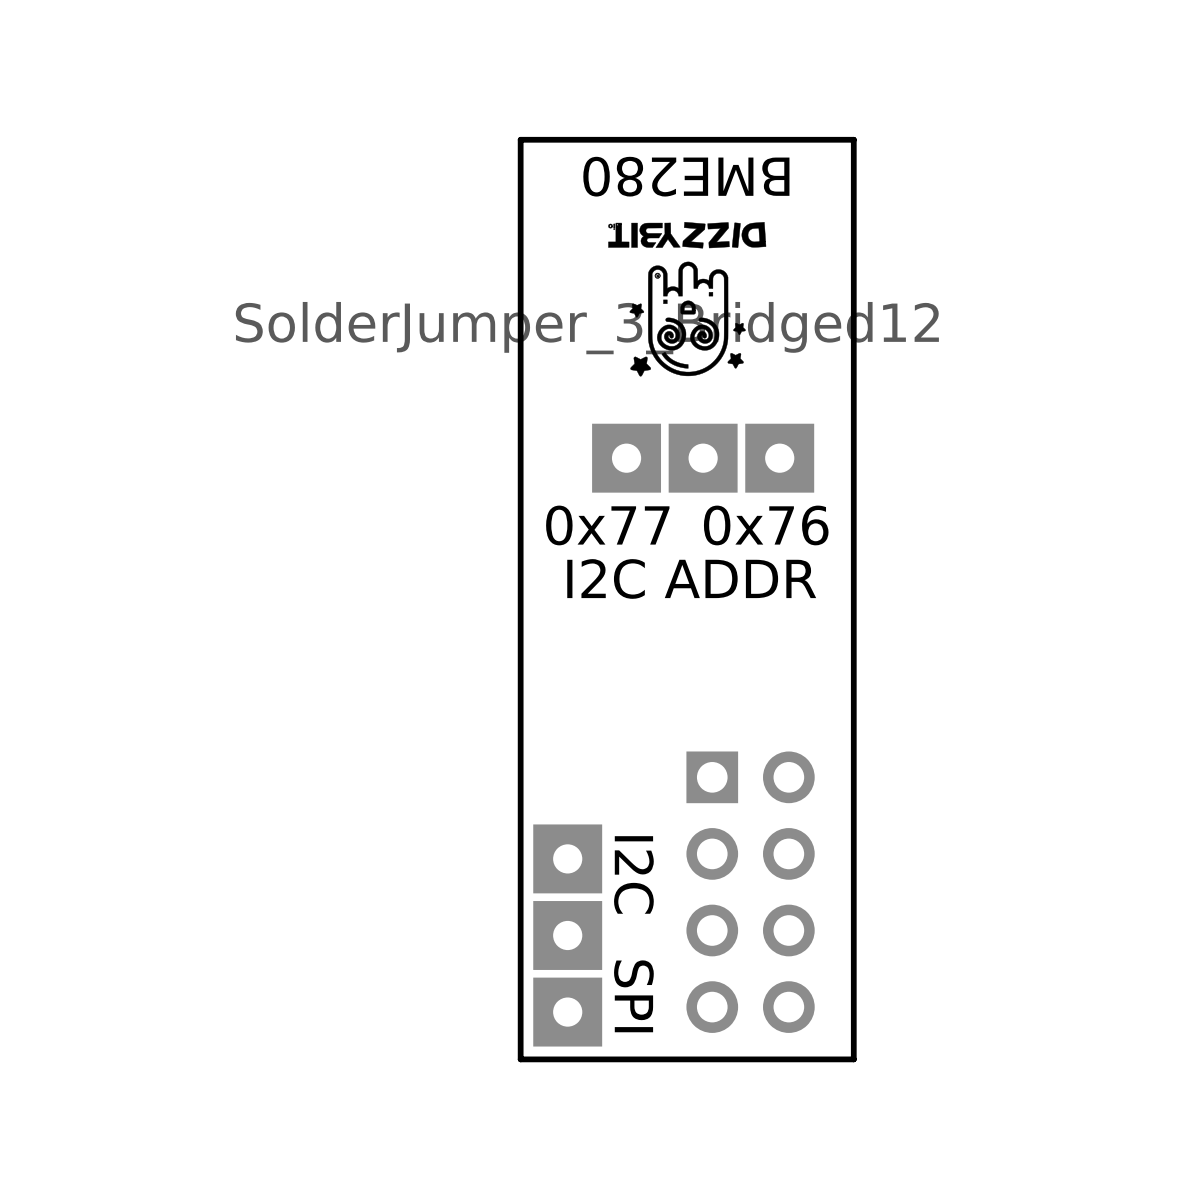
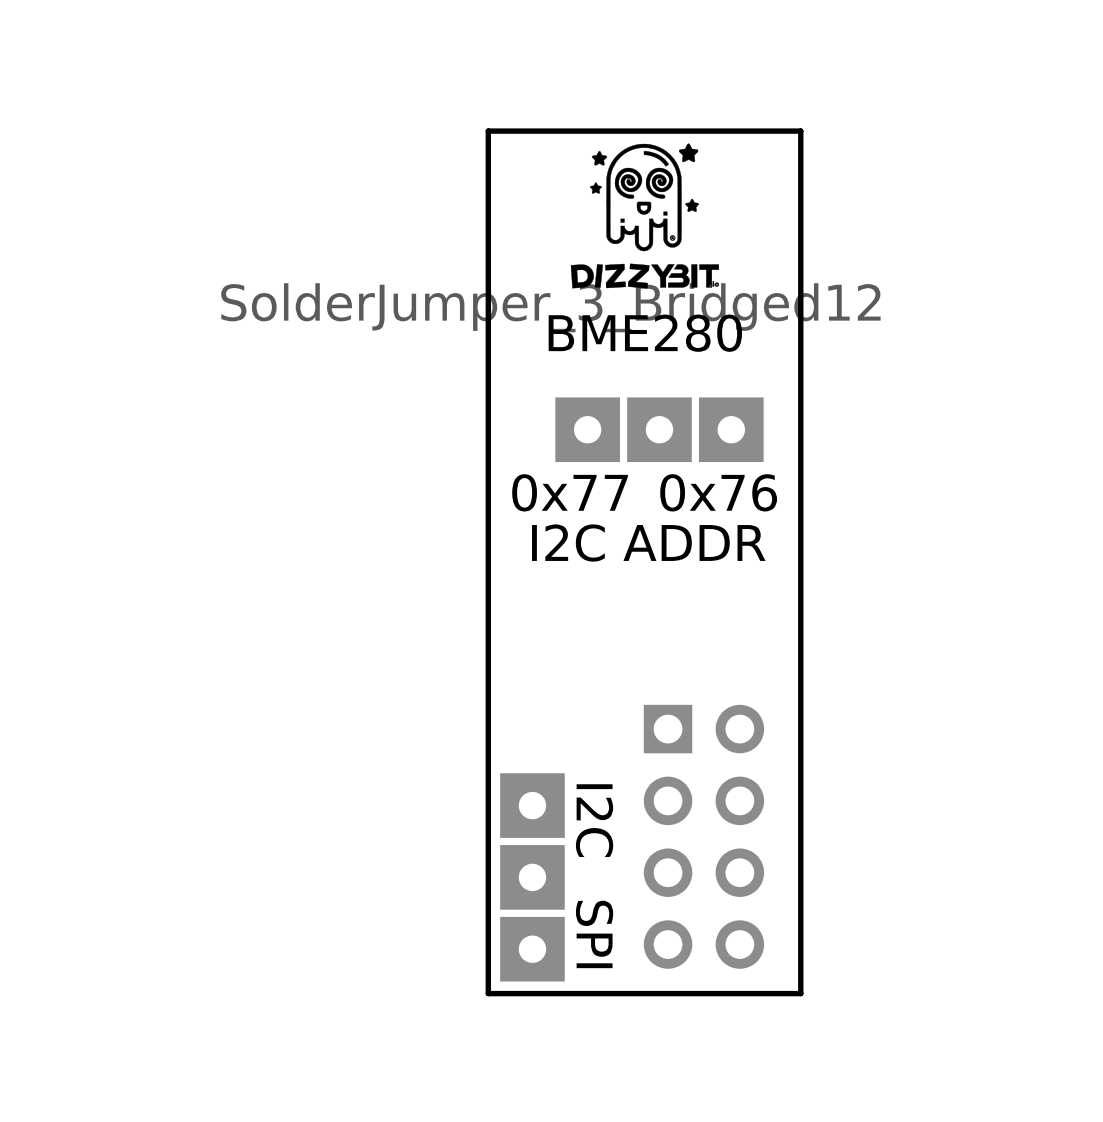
drawing: none -> [570, 143, 719, 289]
text rotation: 0° (686, 176) -> 180° (645, 333)
drawing: [608, 222, 767, 377] -> none

